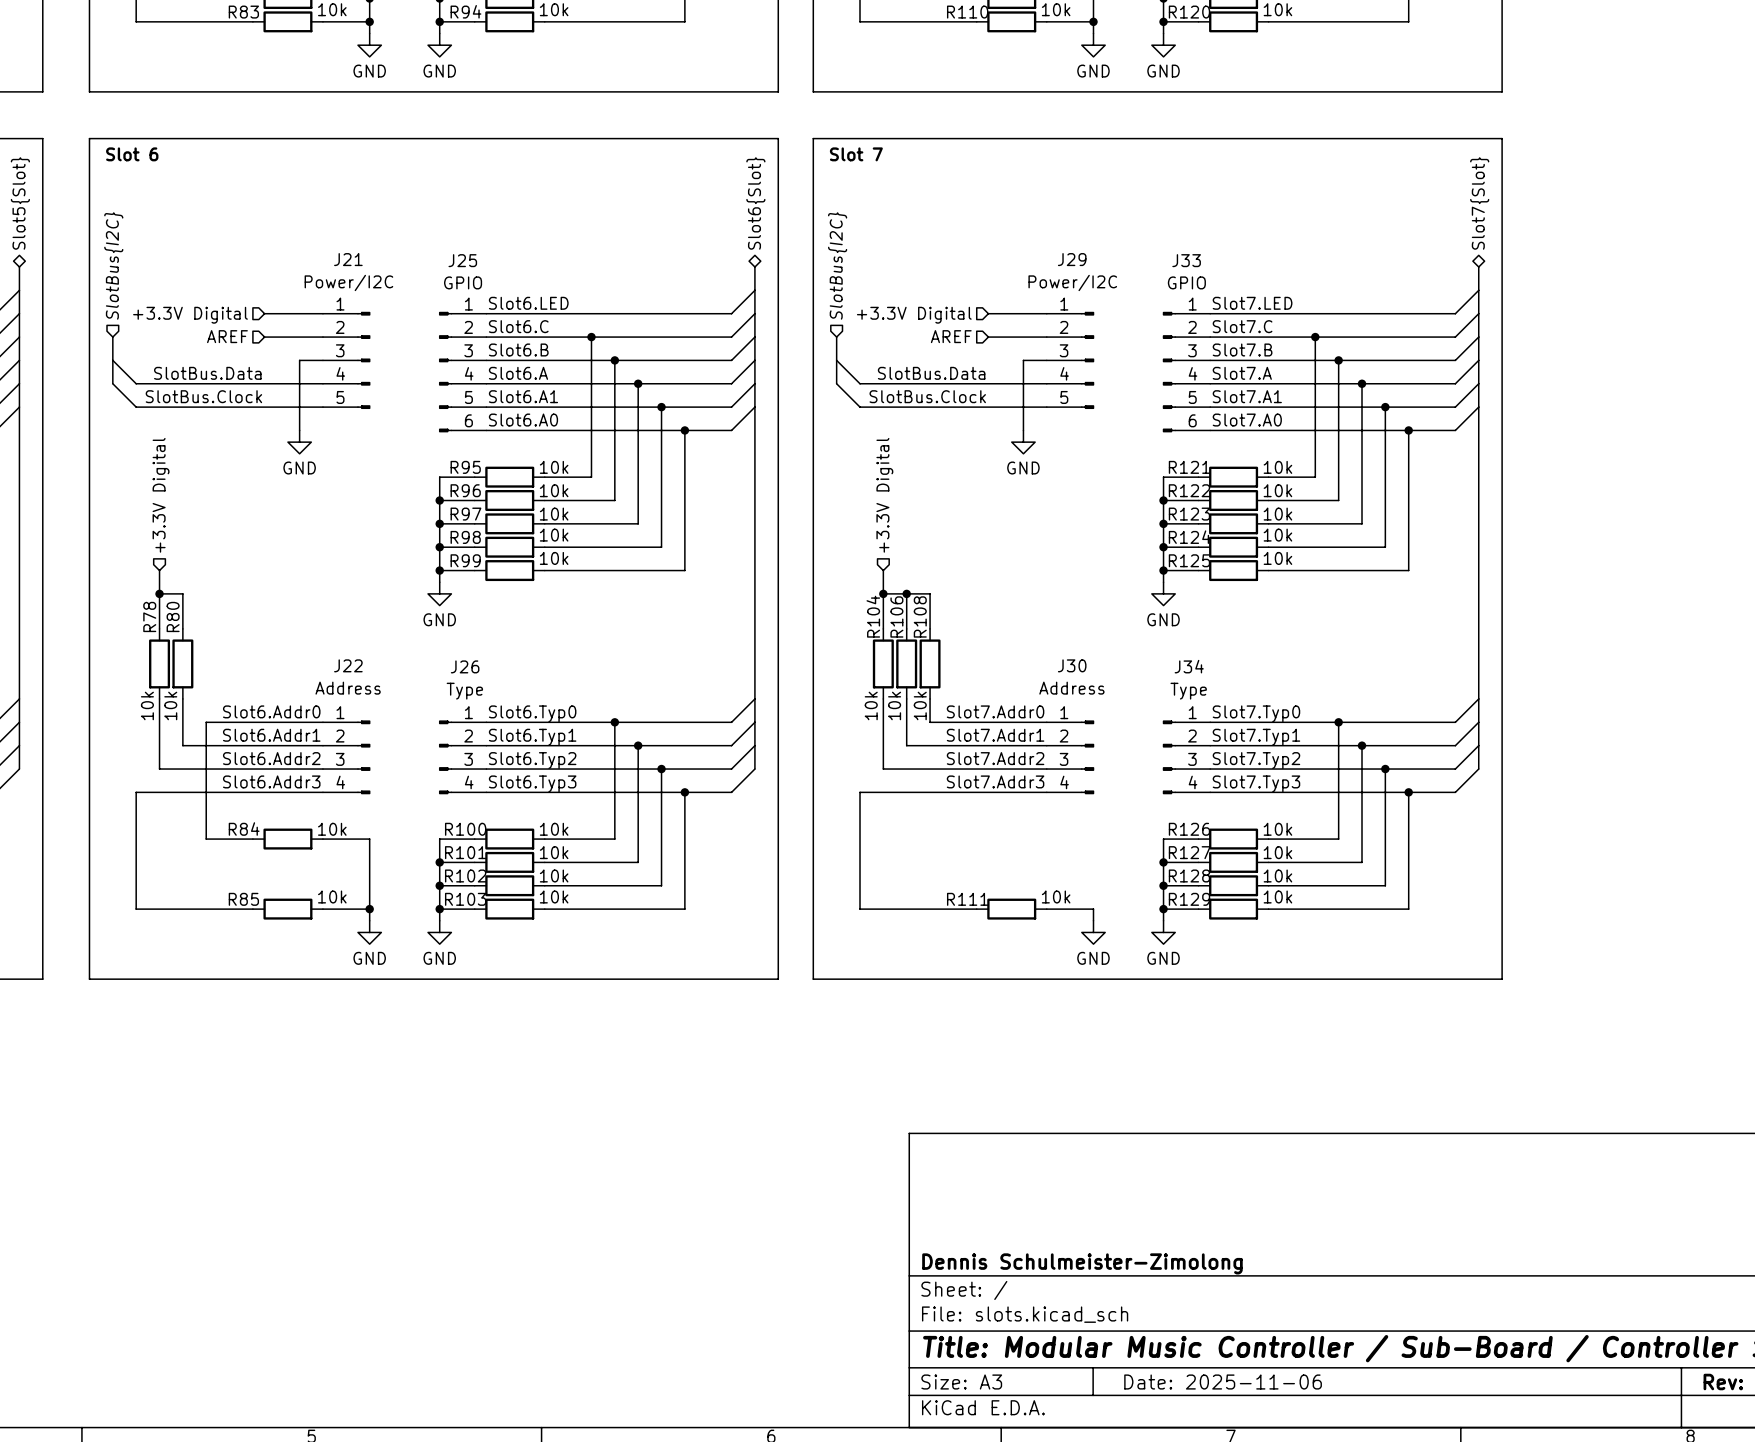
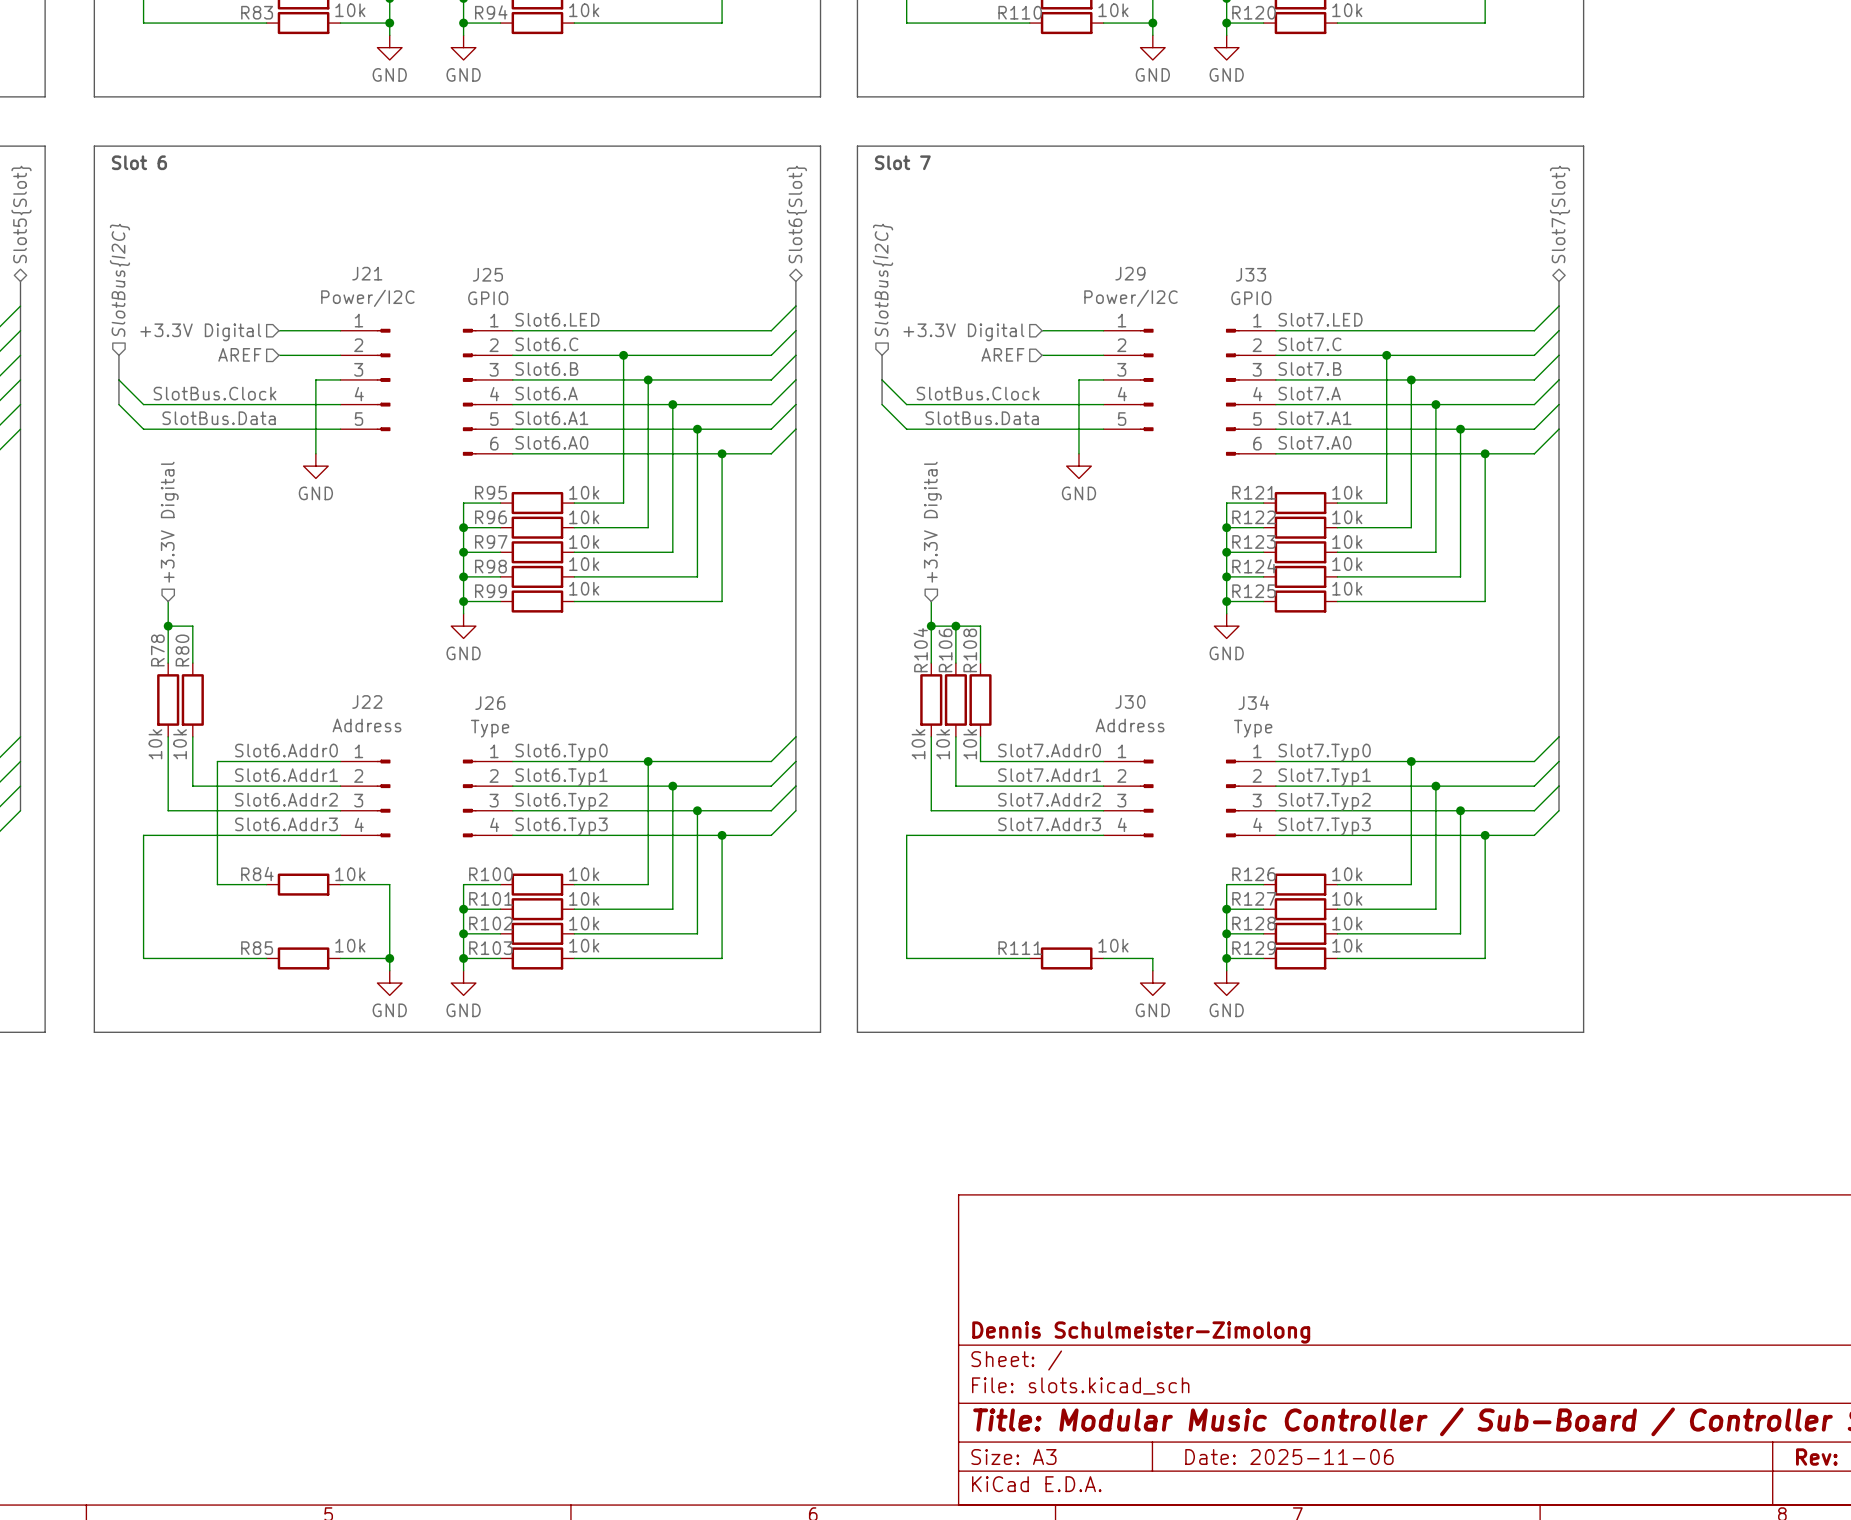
label: SlotBus.Data (207, 373) -> SlotBus.Clock (214, 393)
label: SlotBus.Data (931, 373) -> SlotBus.Clock (978, 393)
label: SlotBus.Clock (203, 396) -> SlotBus.Data (219, 418)
label: SlotBus.Clock (927, 396) -> SlotBus.Data (982, 418)

